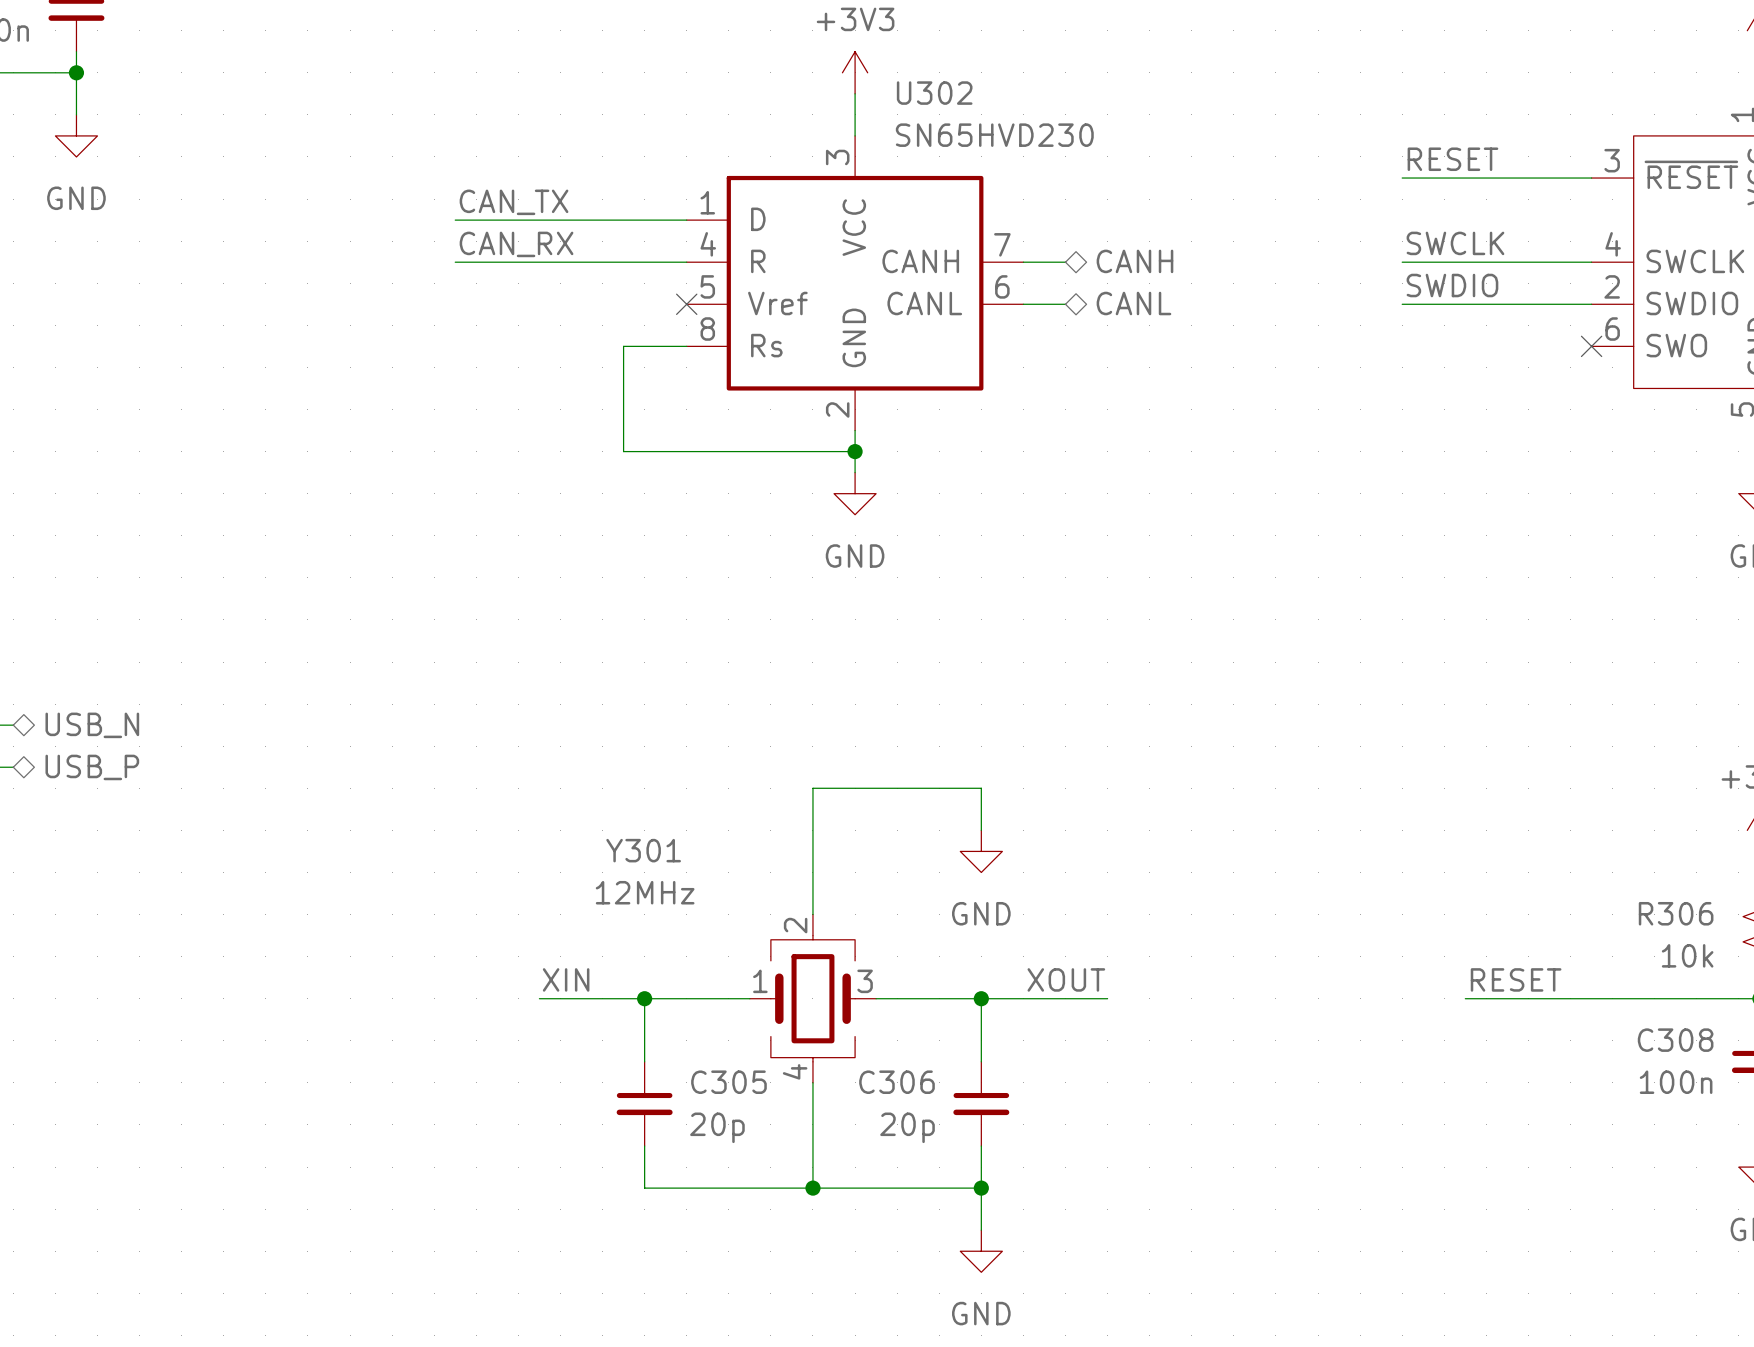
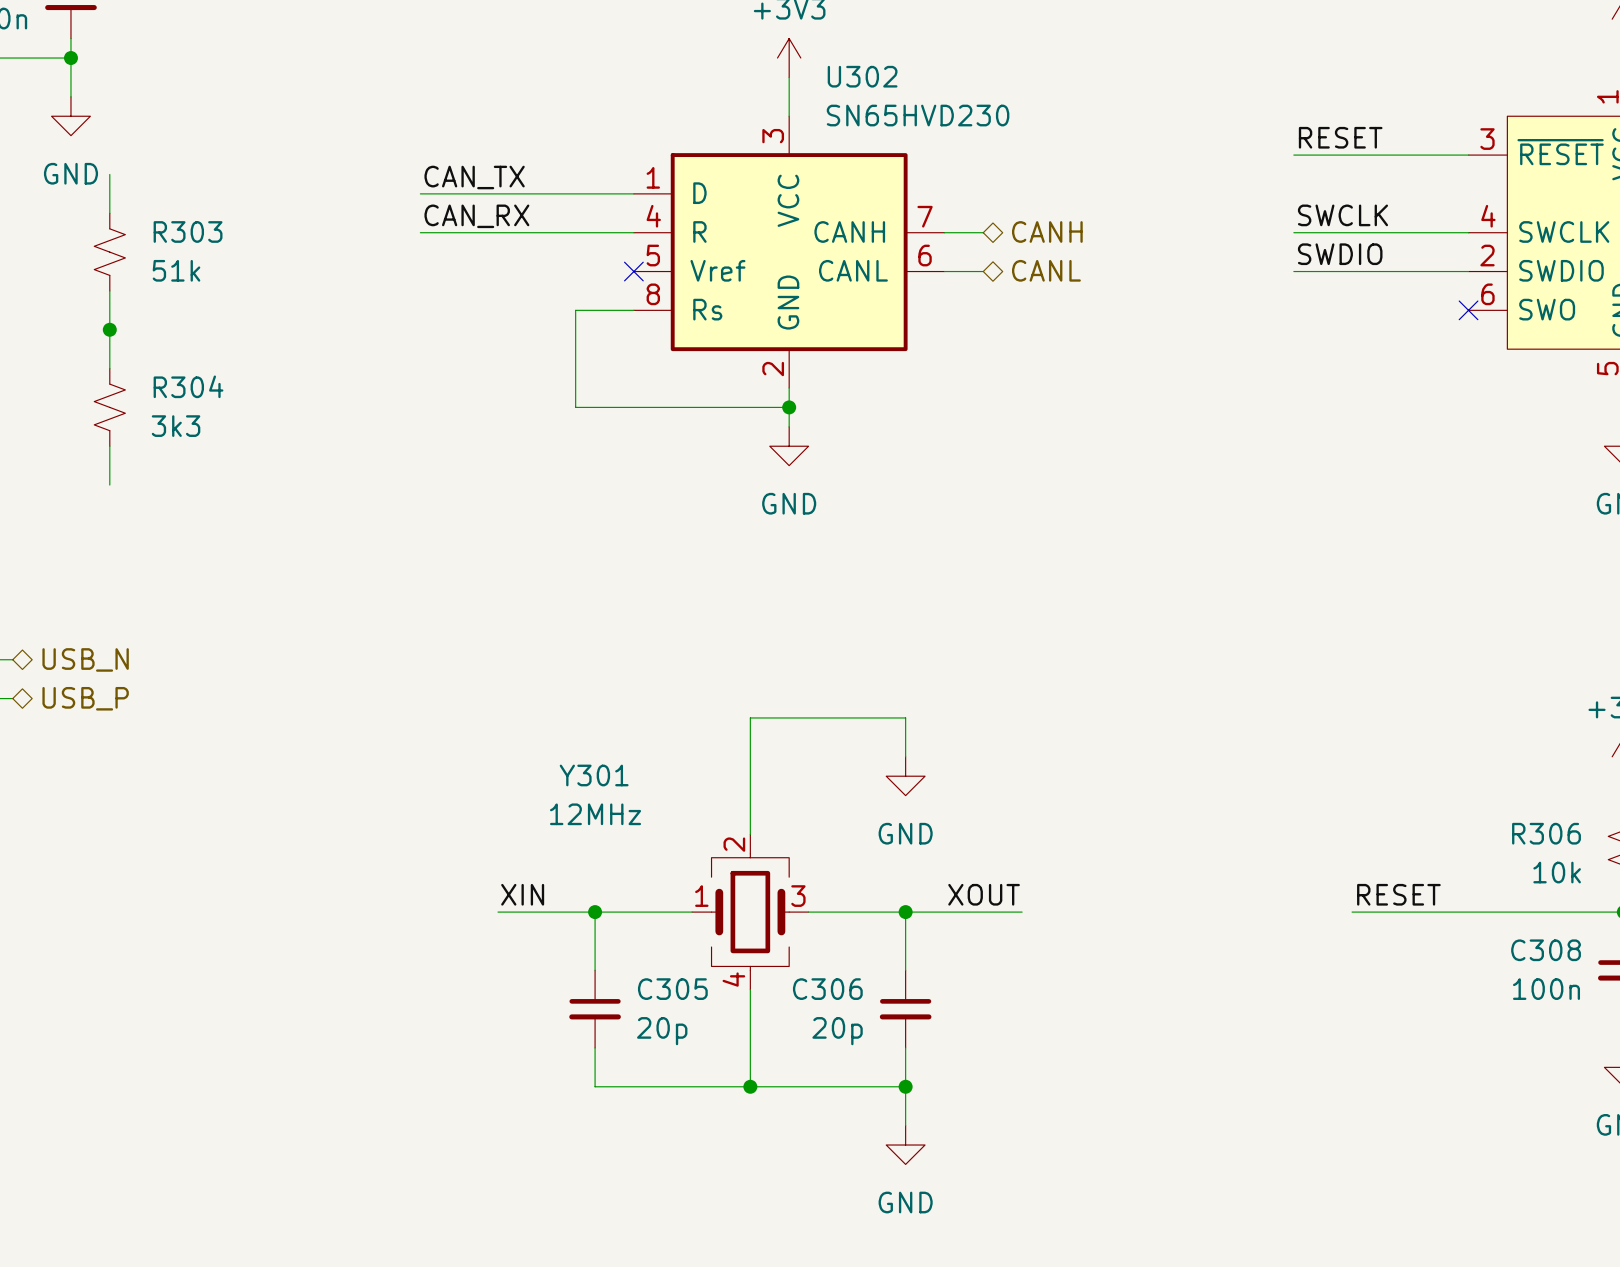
wire: none -> (109, 174) (109, 213)
R303: none -> 51k (109, 252)
wire: none -> (109, 290) (109, 368)
junction: none -> (109, 329)
R304: none -> 3k3 (109, 407)
wire: none -> (109, 446) (109, 485)

